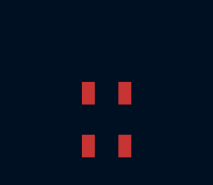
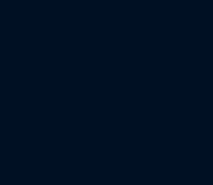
part: (106, 93) -> none
part: (106, 146) -> none

